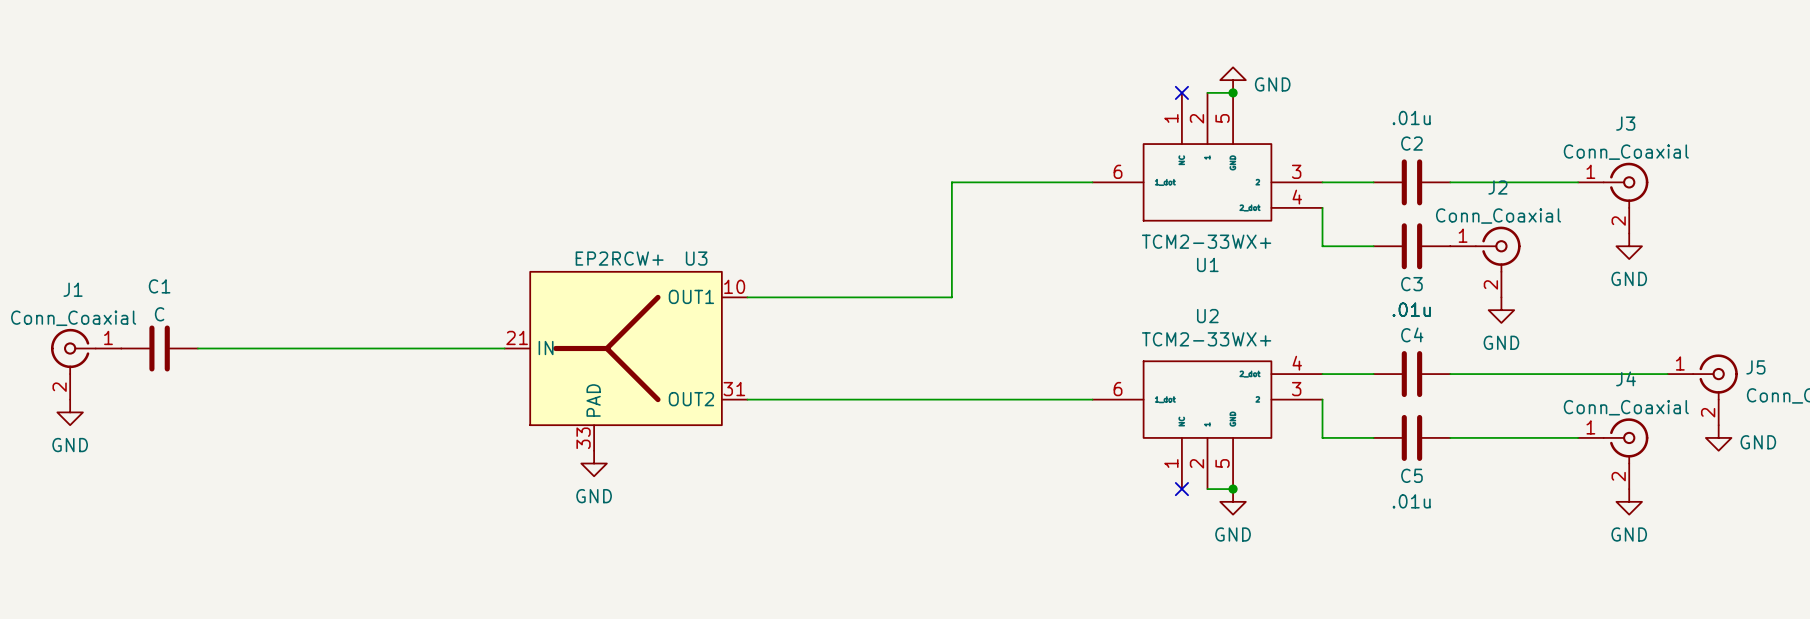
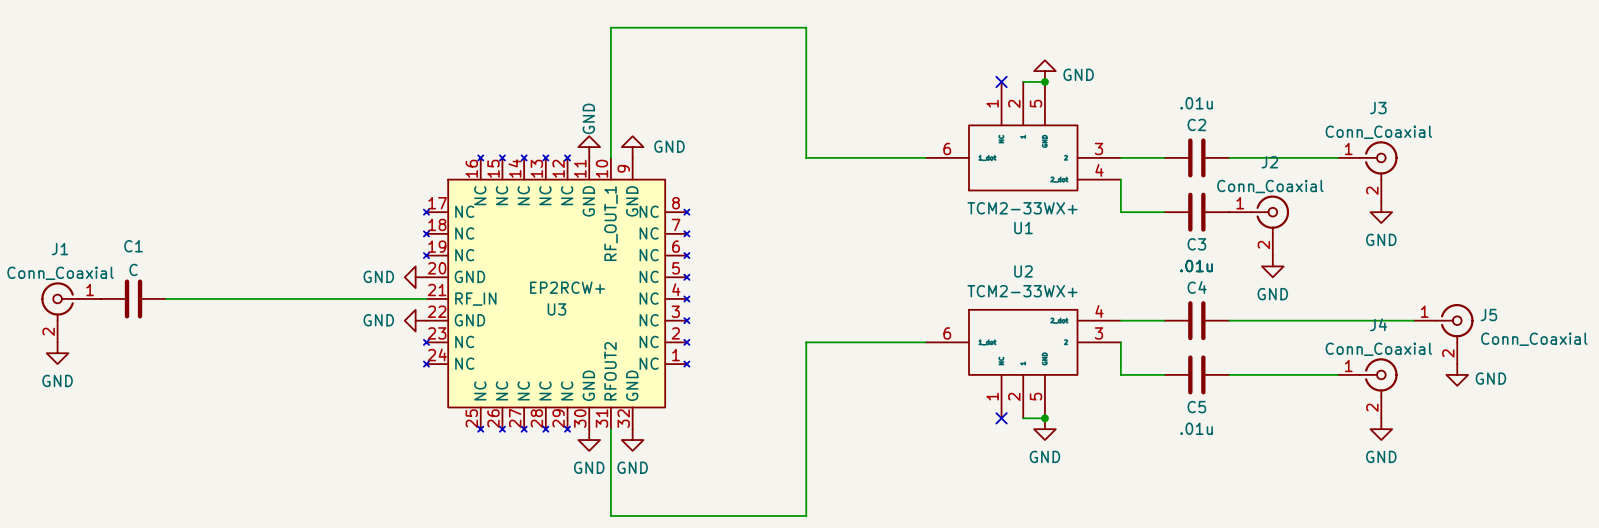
power symbol: none -> GND (589, 147)
power symbol: none -> GND (632, 147)
wire: (951, 182) (951, 297) (747, 297) -> (806, 157) (806, 27) (610, 27) (610, 157)
U3 value position: EP2RCW+ (619, 258) -> EP2RCW+ (567, 287)
U3 name position: U3 (696, 258) -> U3 (556, 309)
U3 symbol: [504, 271, 748, 451] -> [423, 155, 690, 432]
power symbol: none -> GND (415, 277)
power symbol: none -> GND (415, 320)
wire: (747, 399) (951, 399) -> (610, 429) (610, 515) (806, 515) (806, 342)
power symbol: GND (594, 463) -> none
power symbol: none -> GND (589, 440)
power symbol: none -> GND (632, 440)

